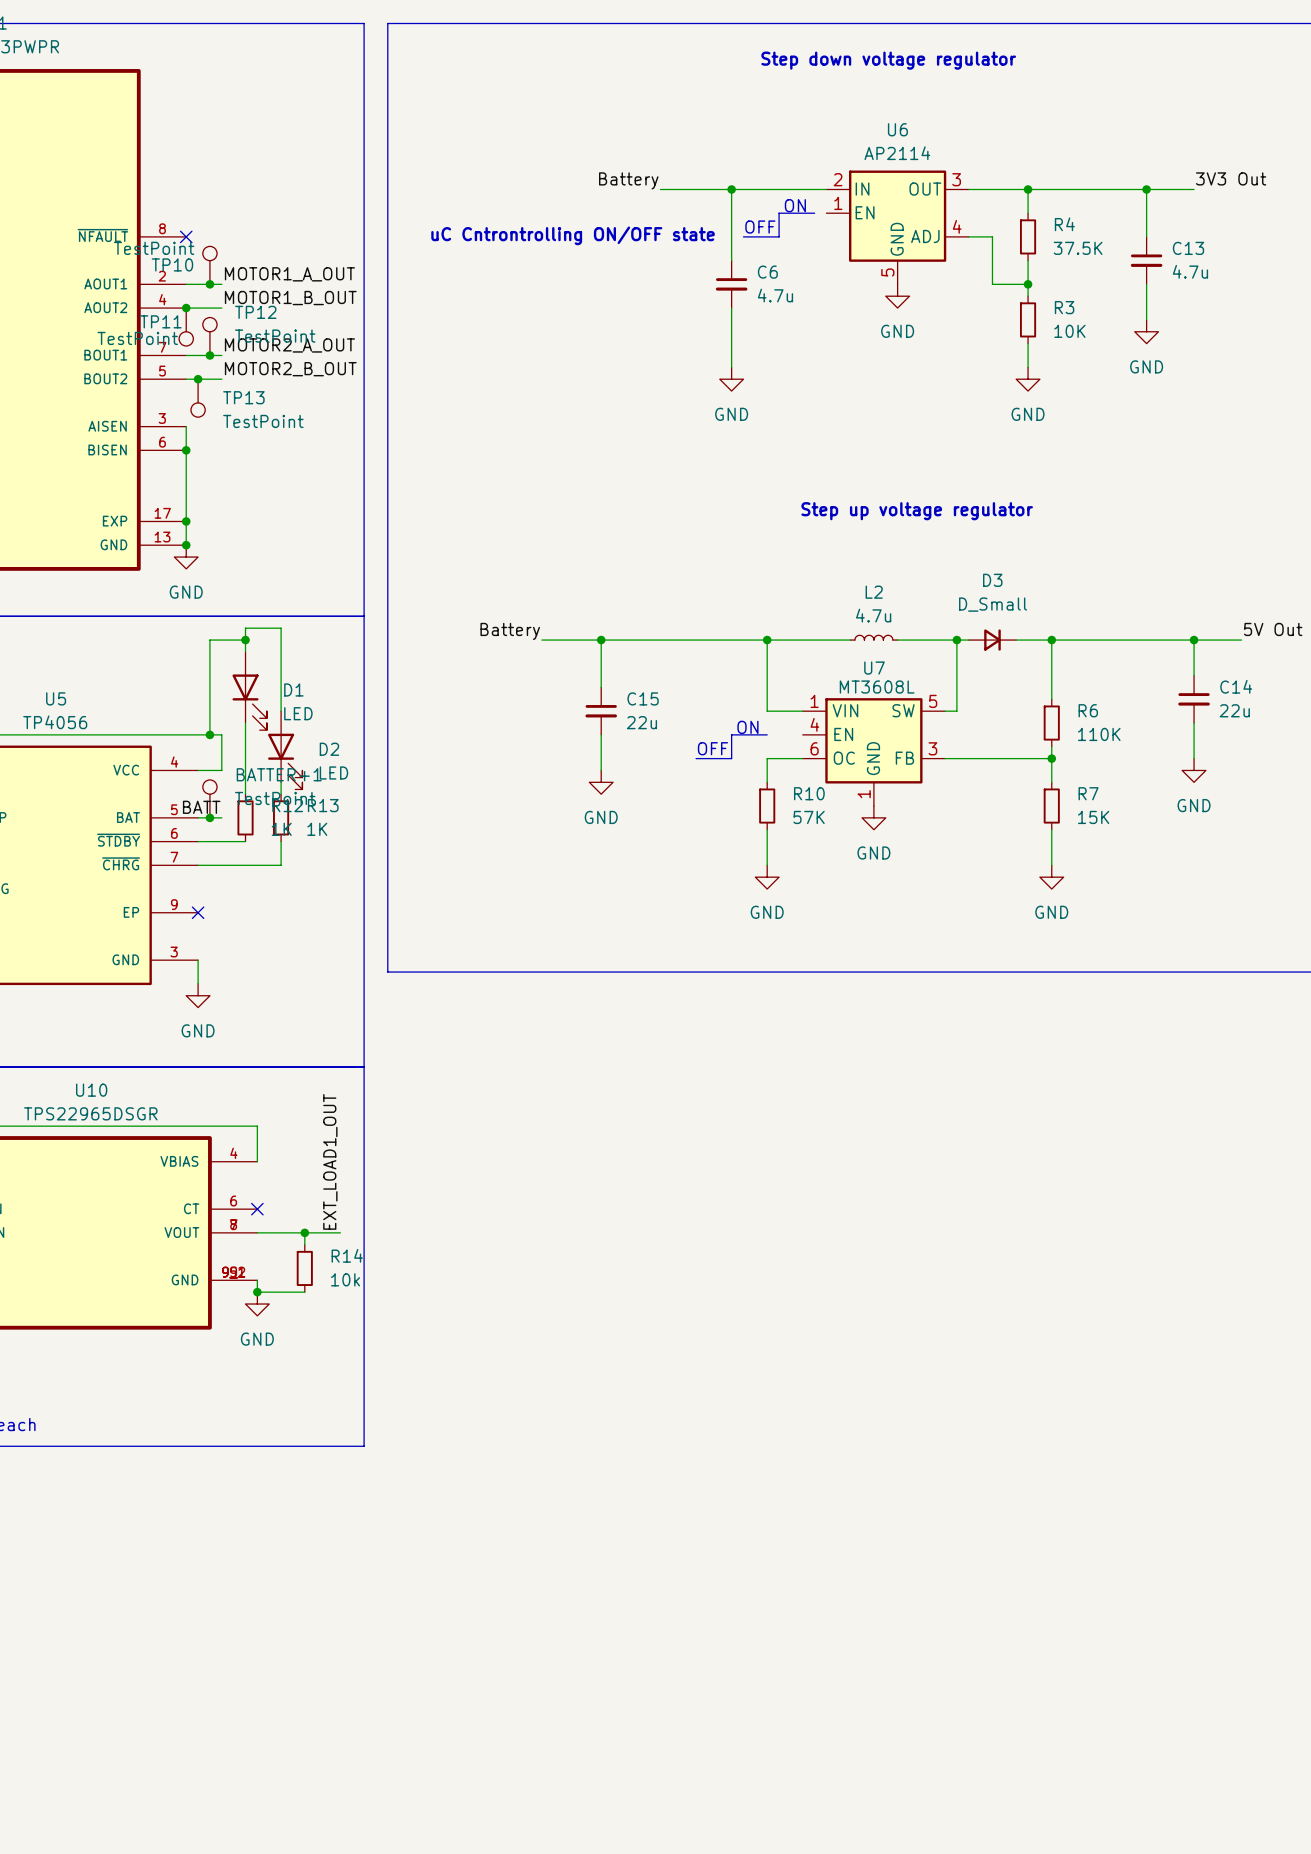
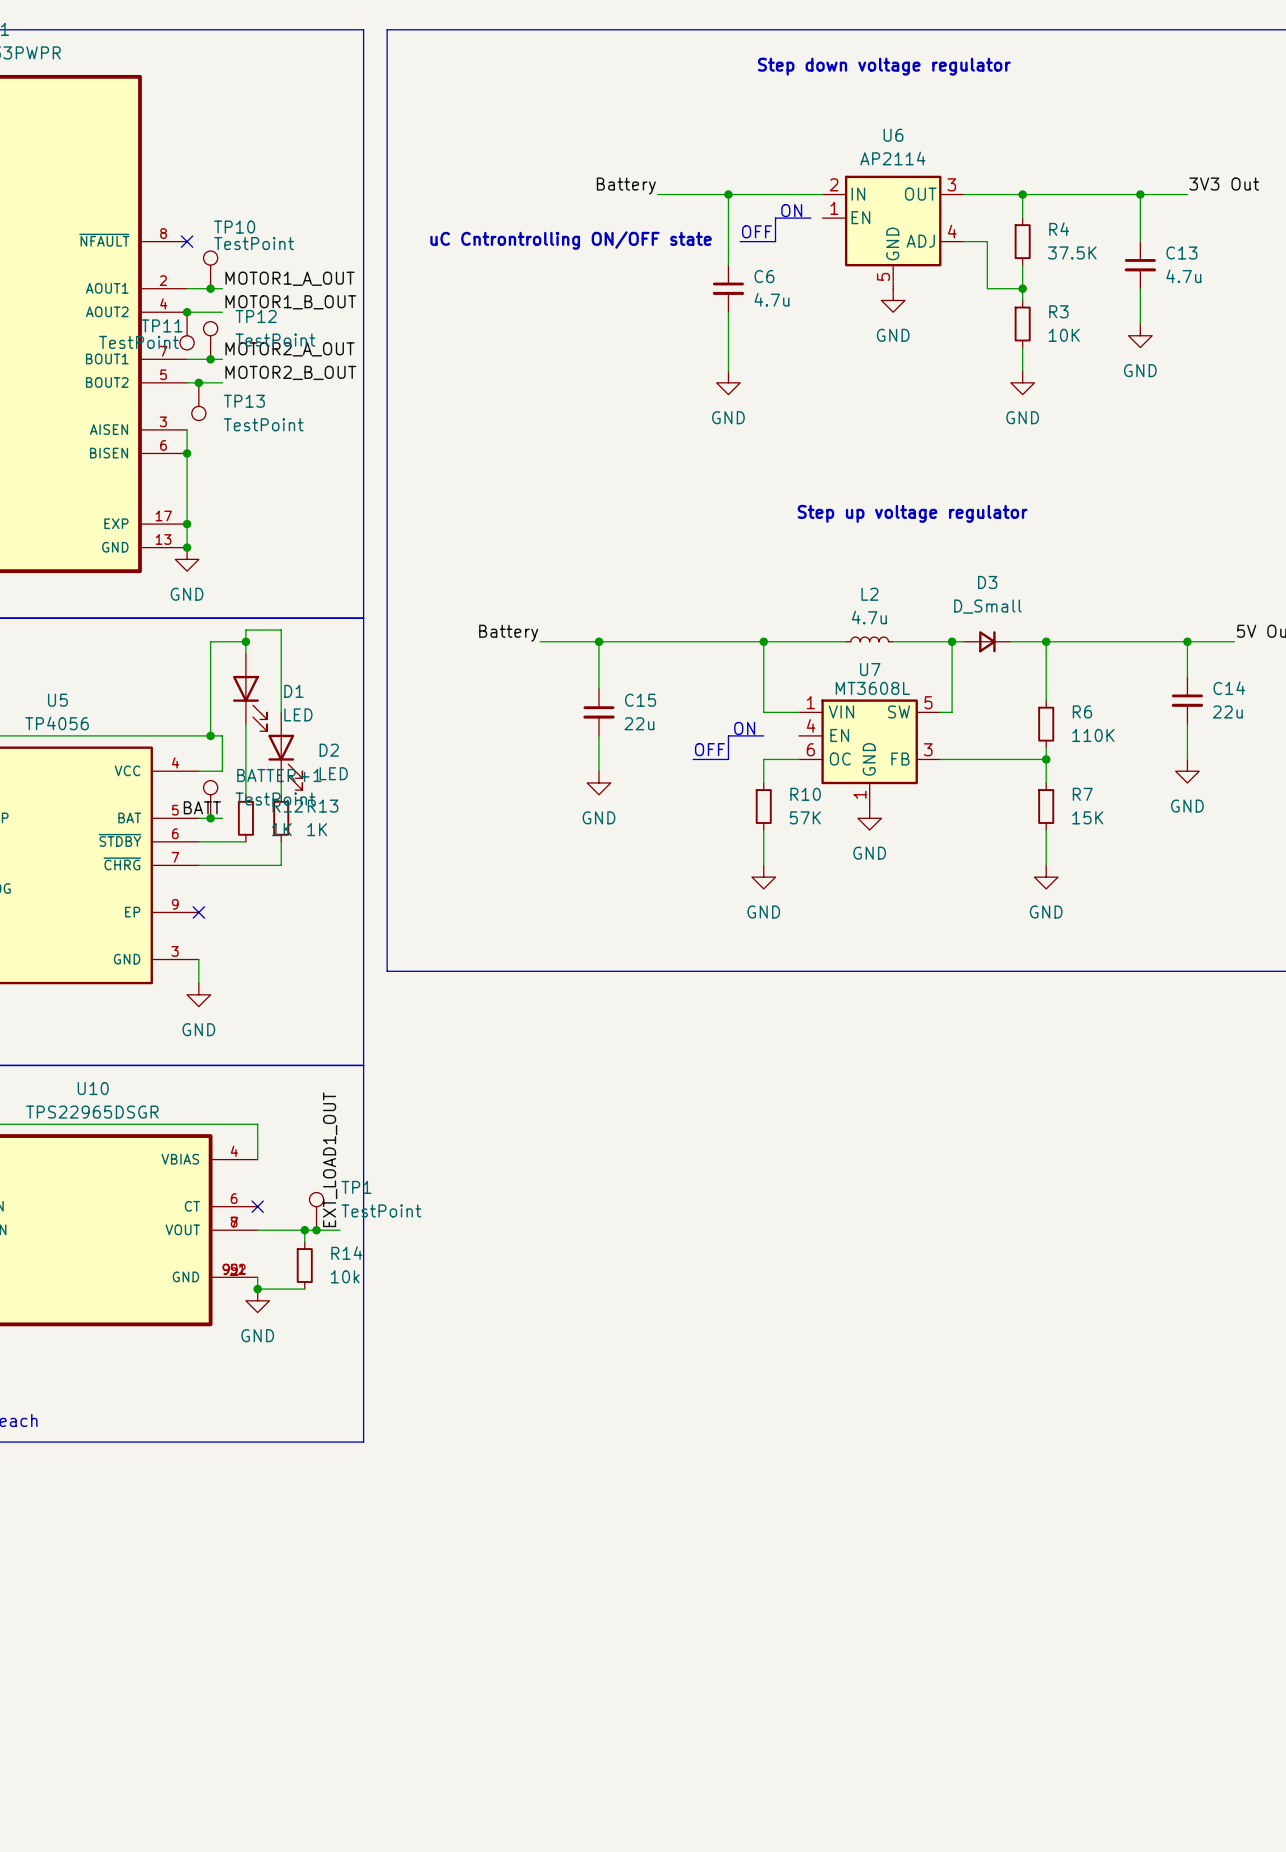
TP10 value position: TestPoint (154, 248) -> TestPoint (254, 243)
TP10 name position: TP10 (172, 264) -> TP10 (234, 227)
TP1: none -> TestPoint (316, 1211)
junction: none -> (316, 1230)

